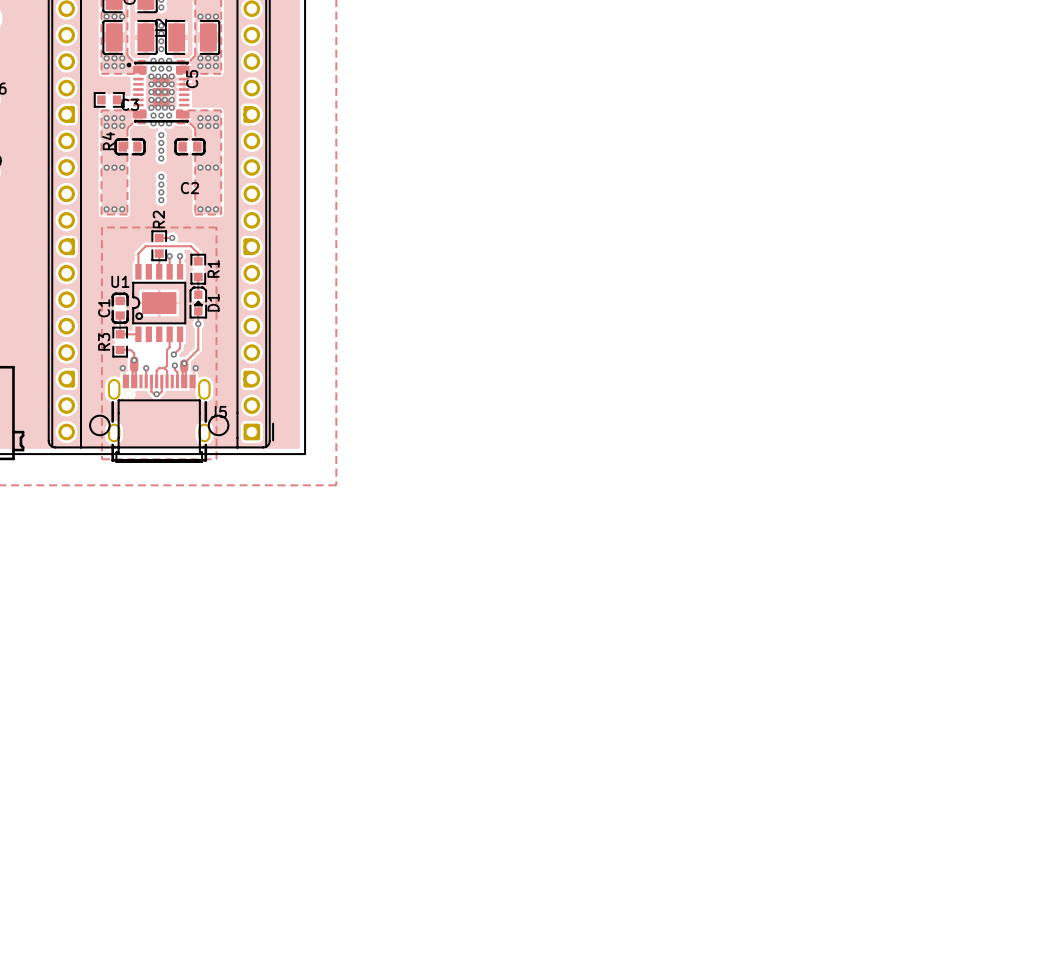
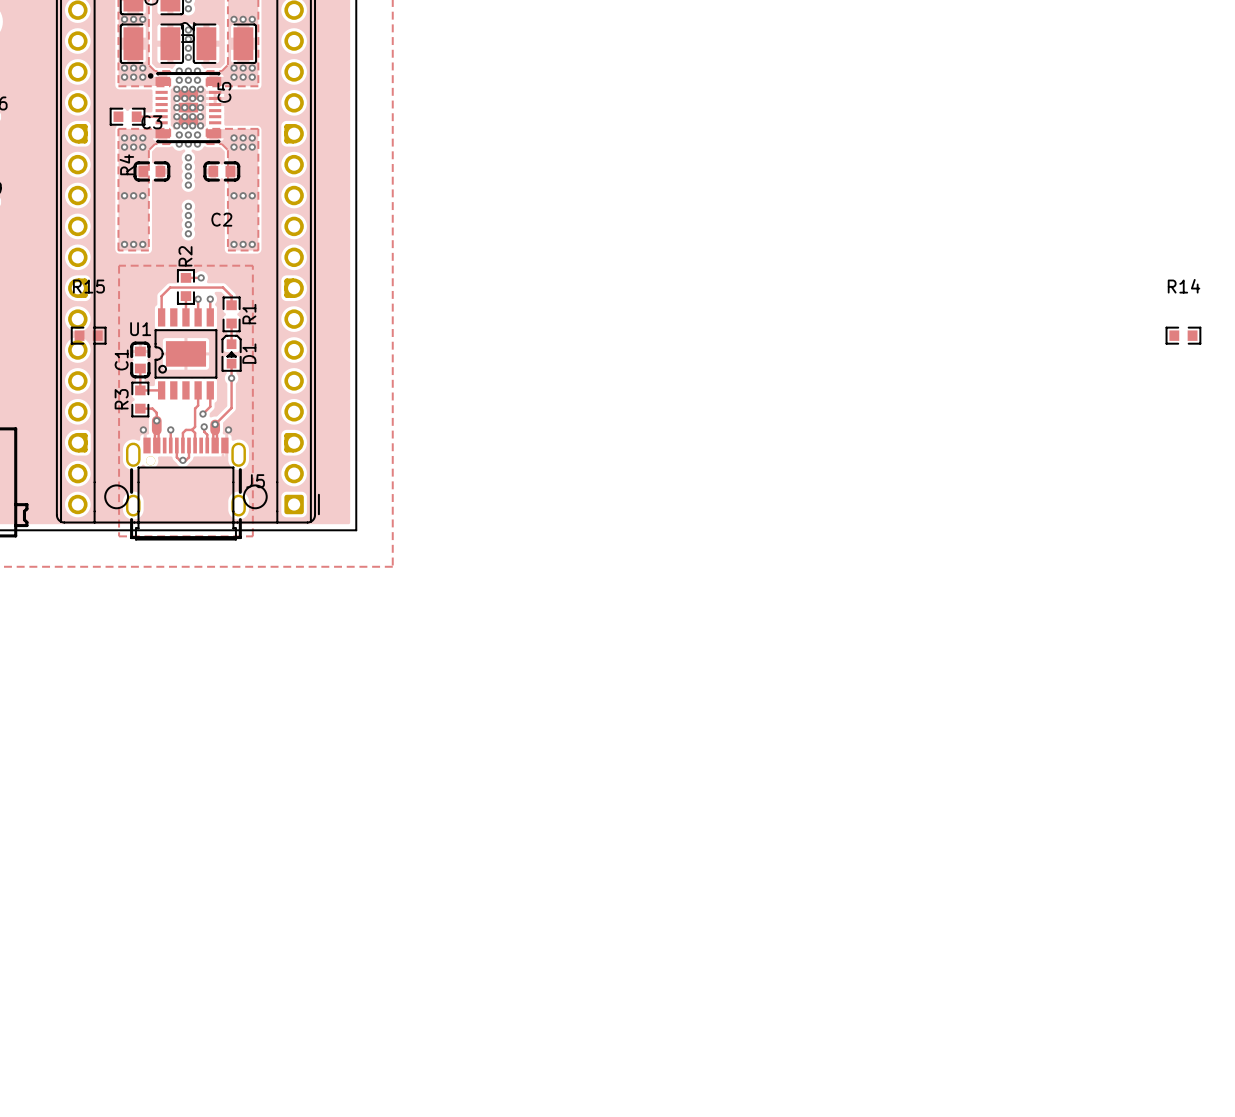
R15: none -> (88, 335)
R14: none -> (1183, 335)

